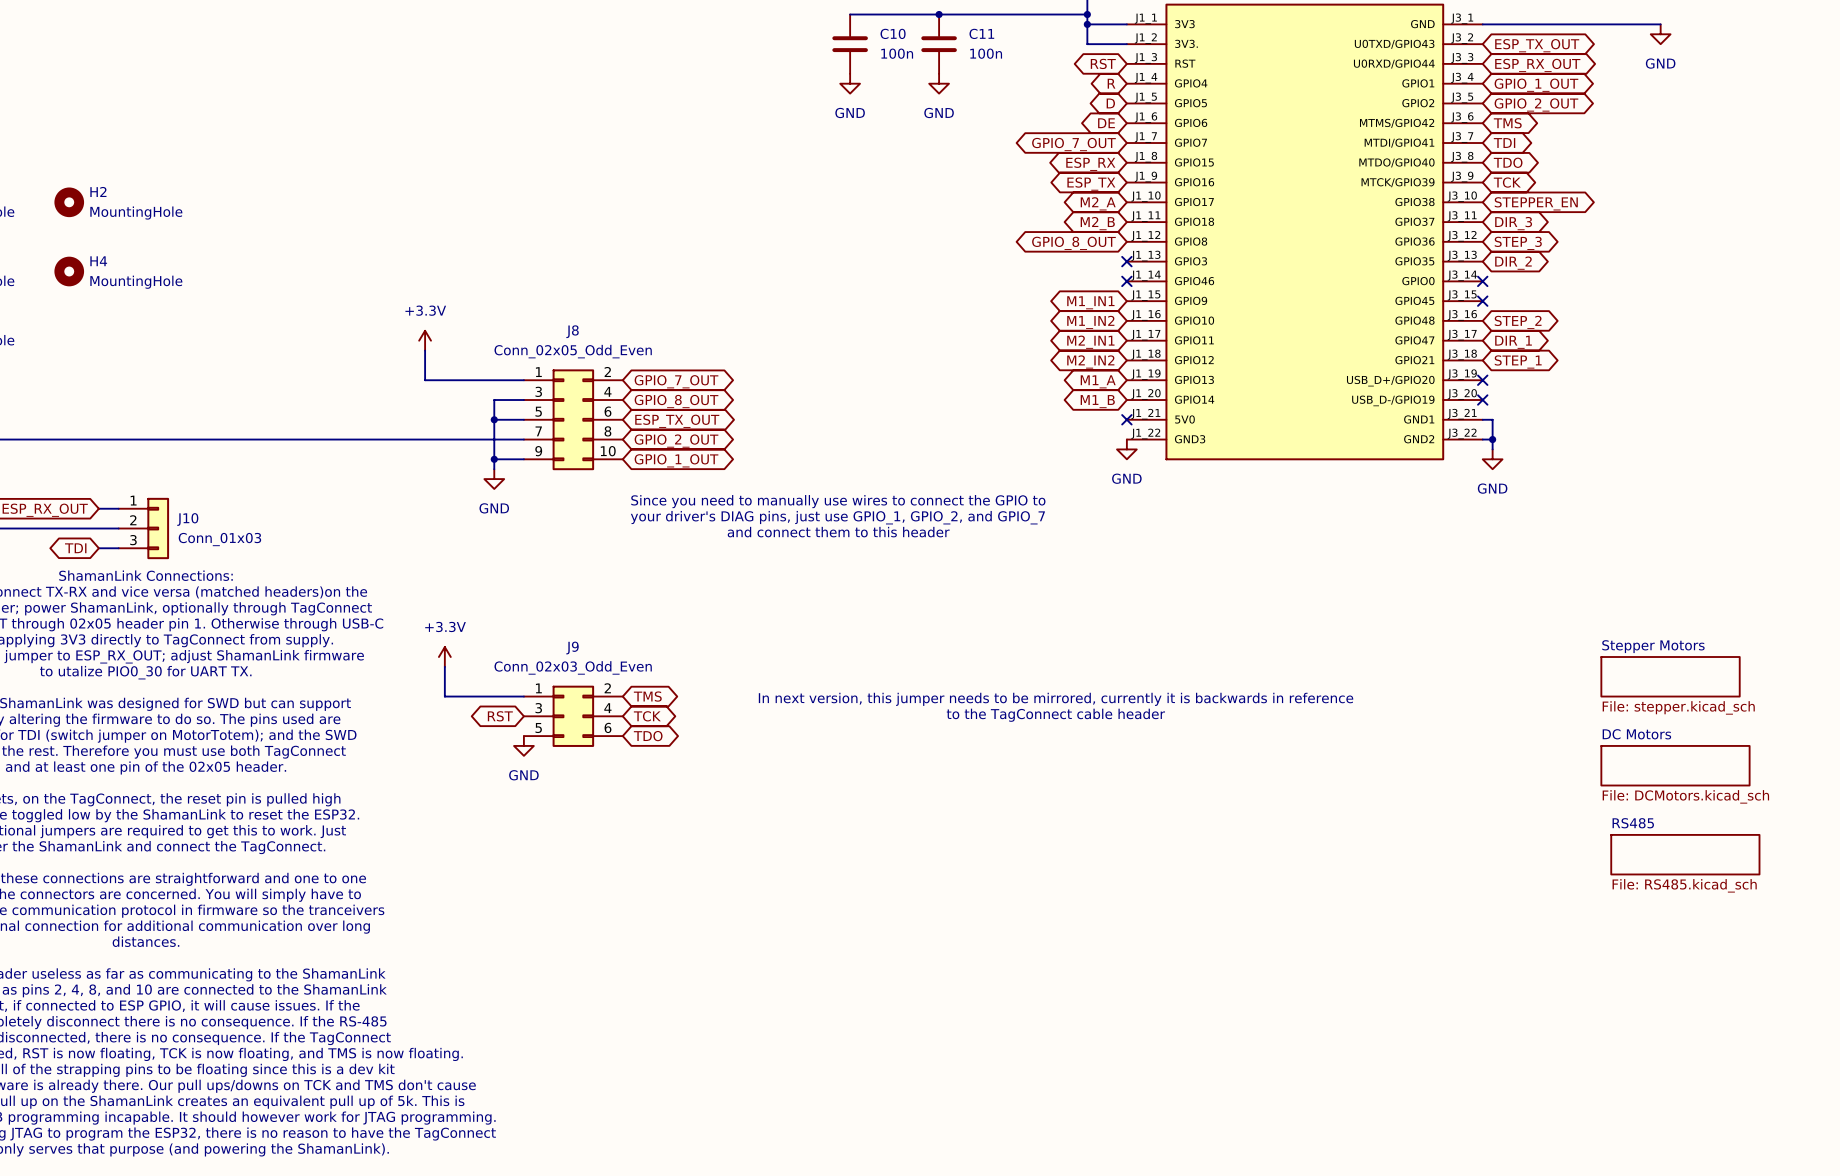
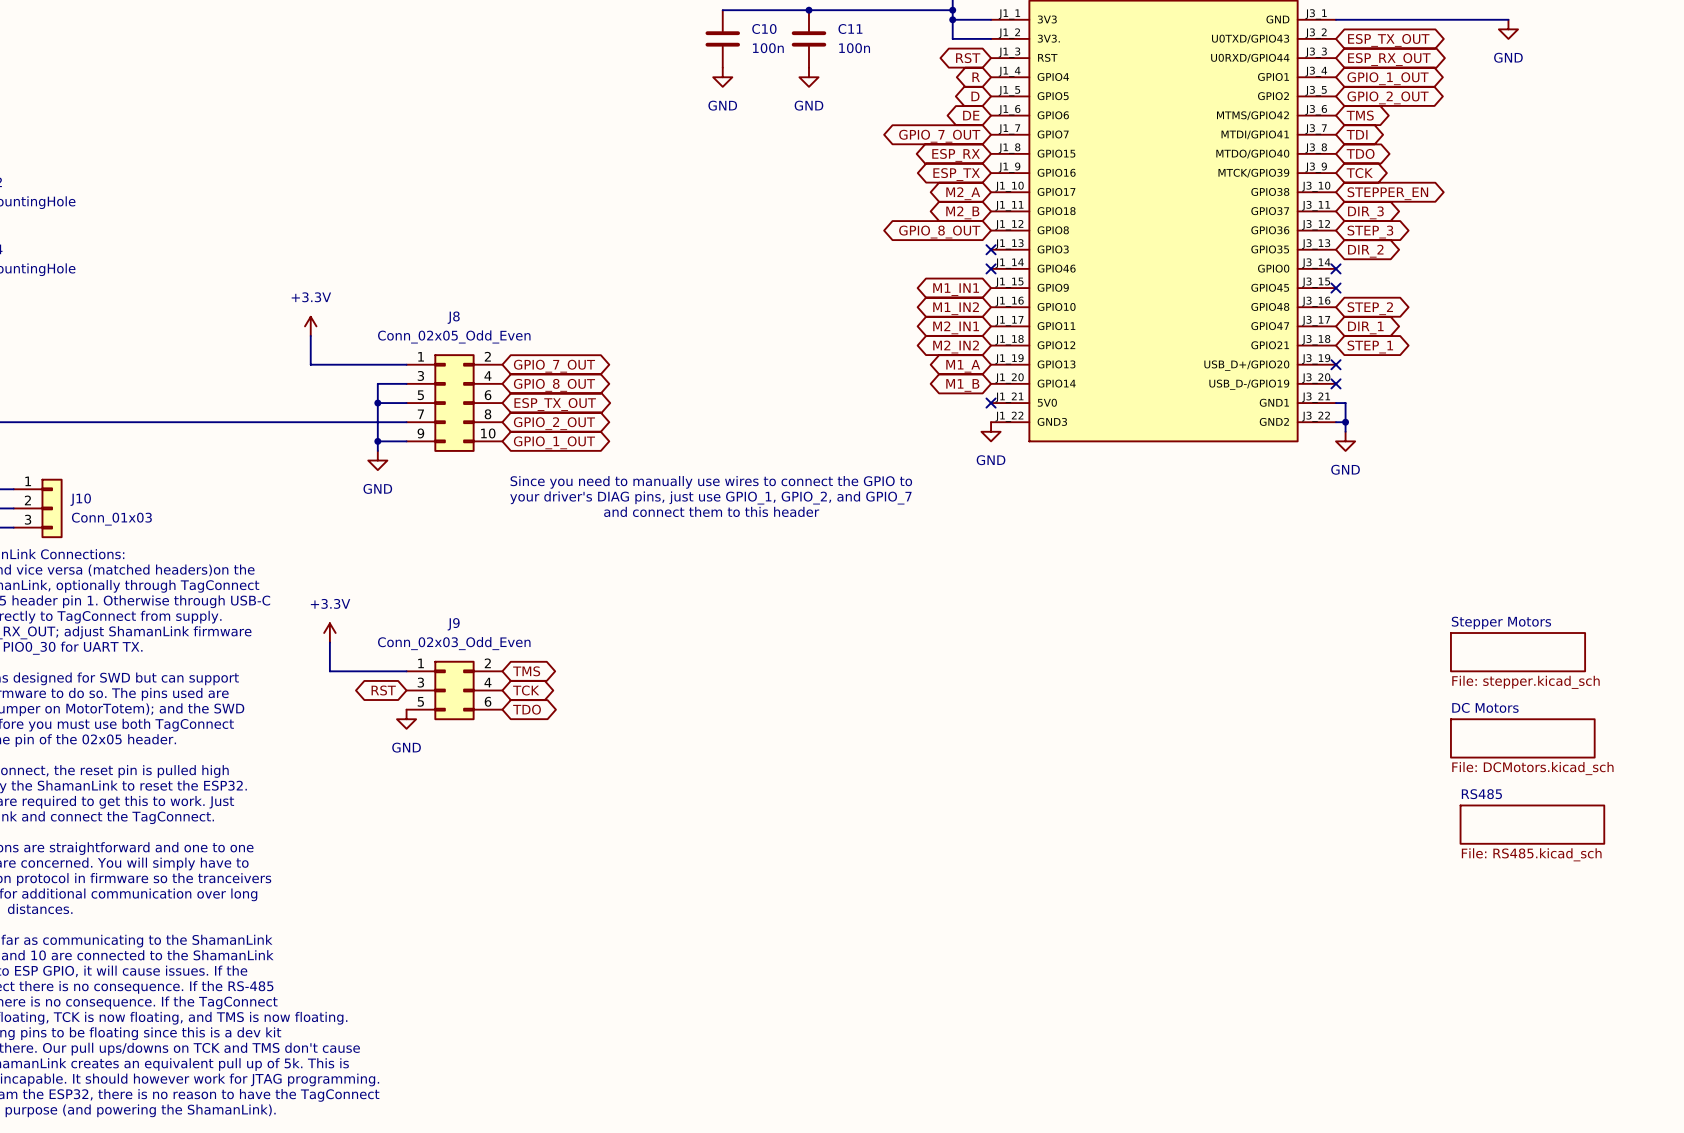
text: In next version, this jumper needs to be mirrored, currently it is backwards in reference (1056, 699) -> none
text: to the TagConnect cable header (1055, 715) -> none

